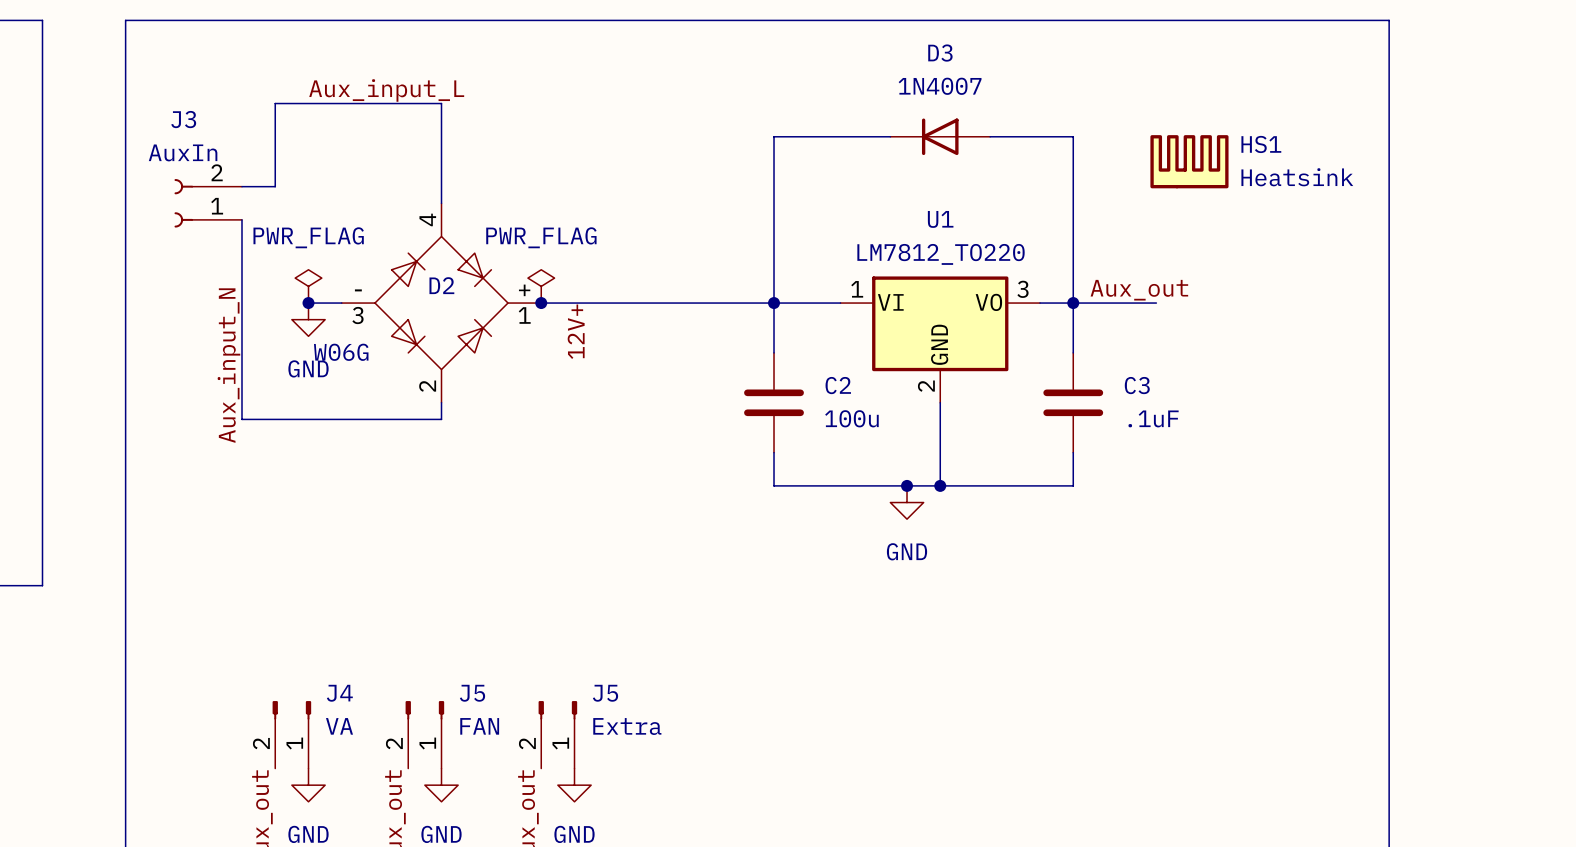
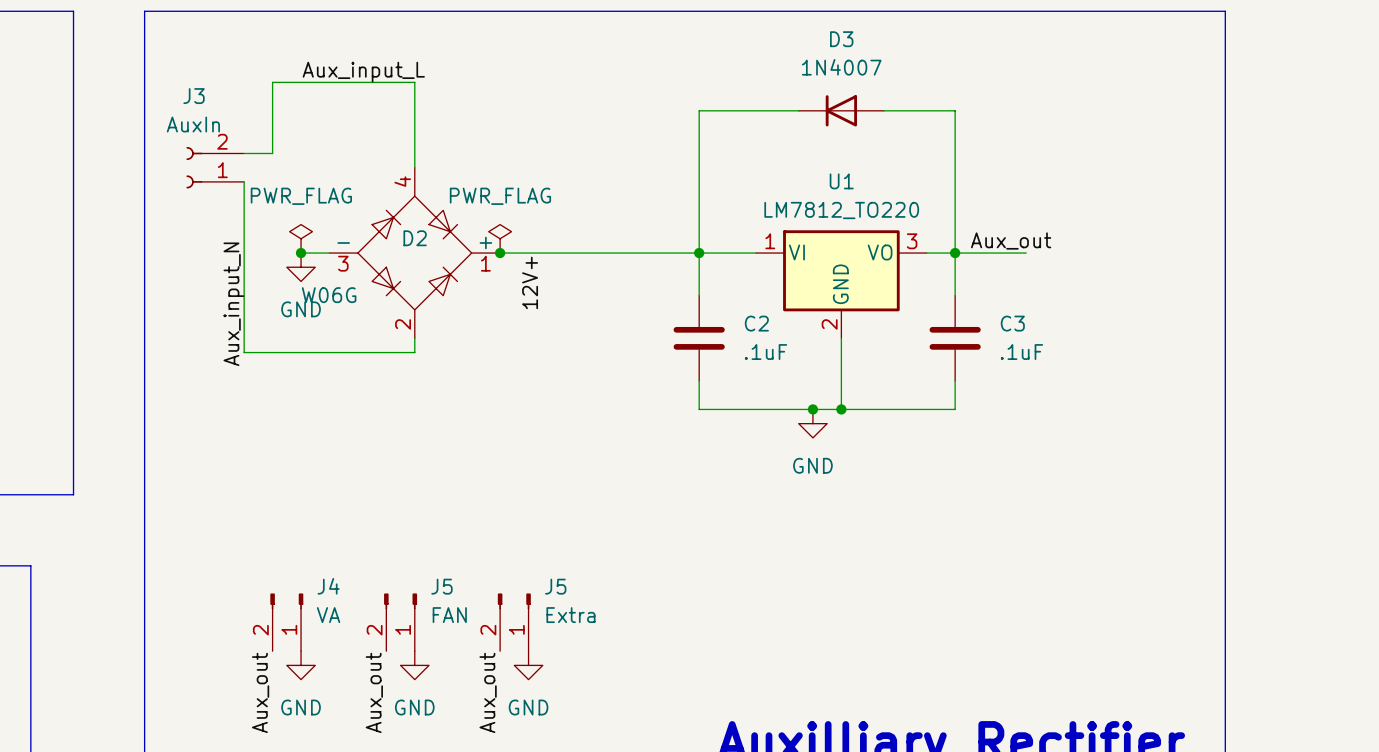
HS1: Heatsink (1189, 161) -> none
C2 value: 100u (851, 418) -> .1uF (765, 352)

